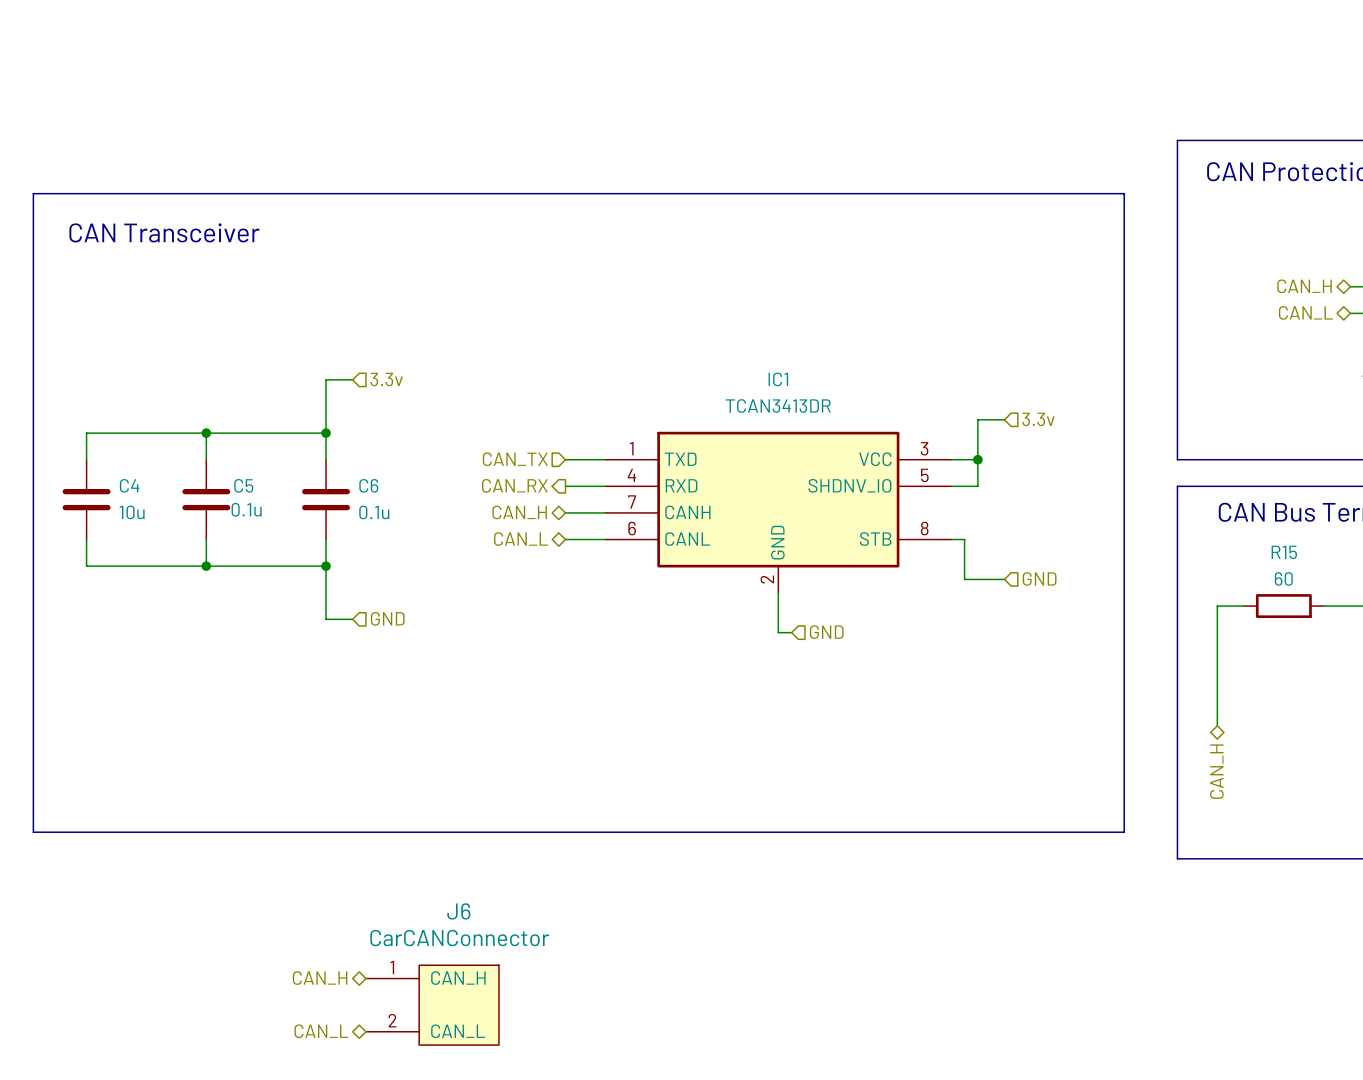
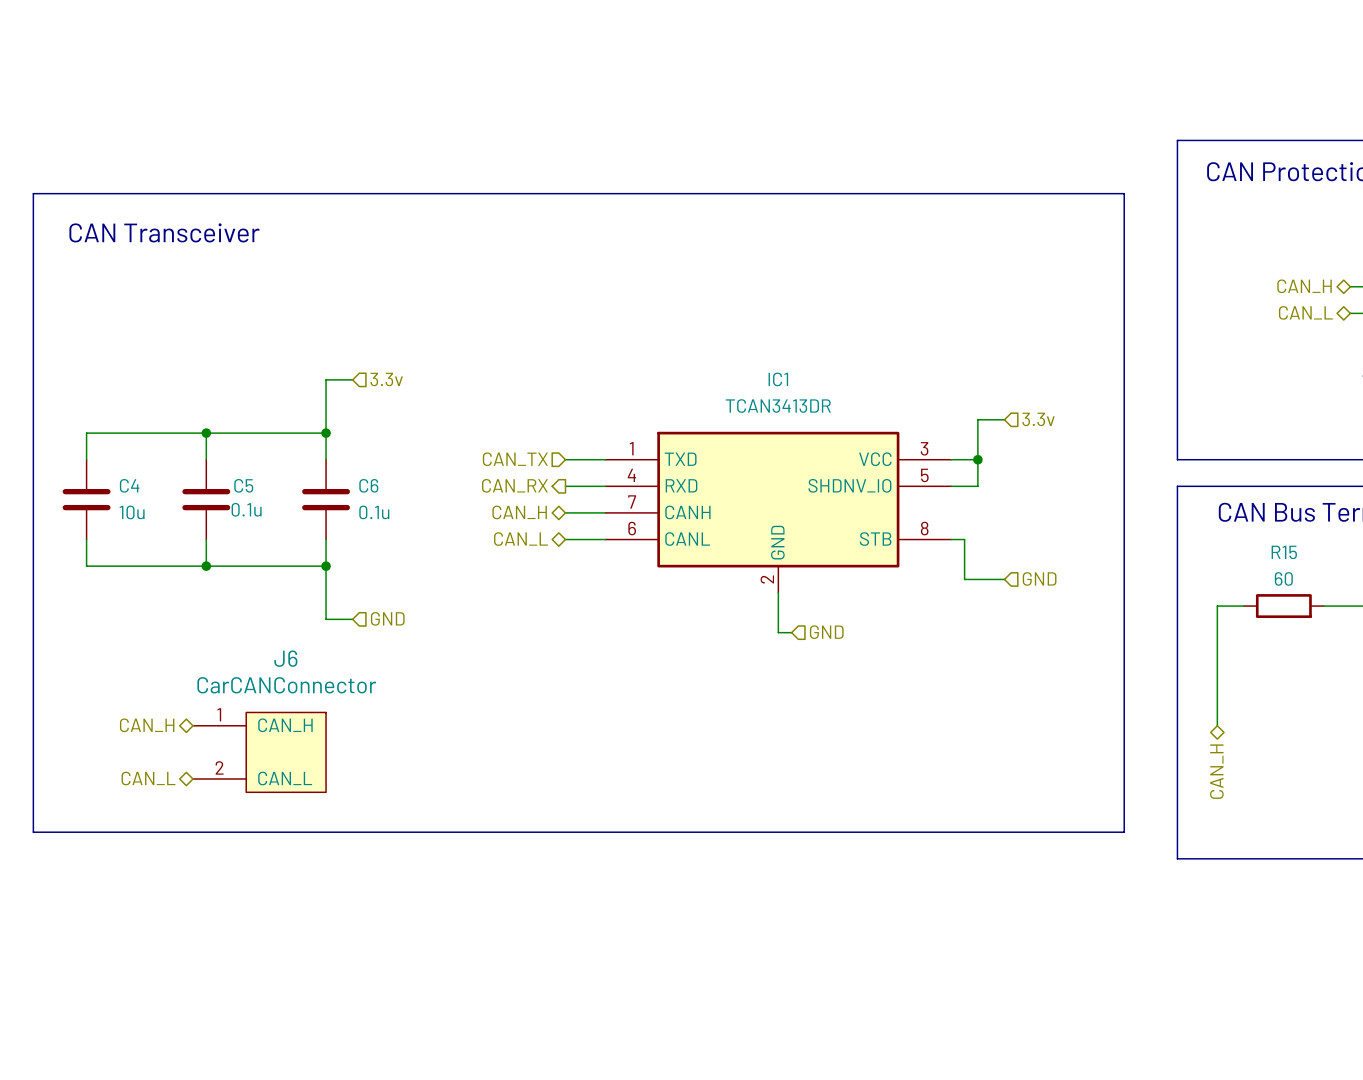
hierarchical label: none -> CAN_H (147, 725)
hierarchical label: none -> CAN_L (148, 778)
hierarchical label: CAN_H (320, 978) -> none
J6 position: (432, 1005) -> (259, 752)
hierarchical label: CAN_L (321, 1031) -> none

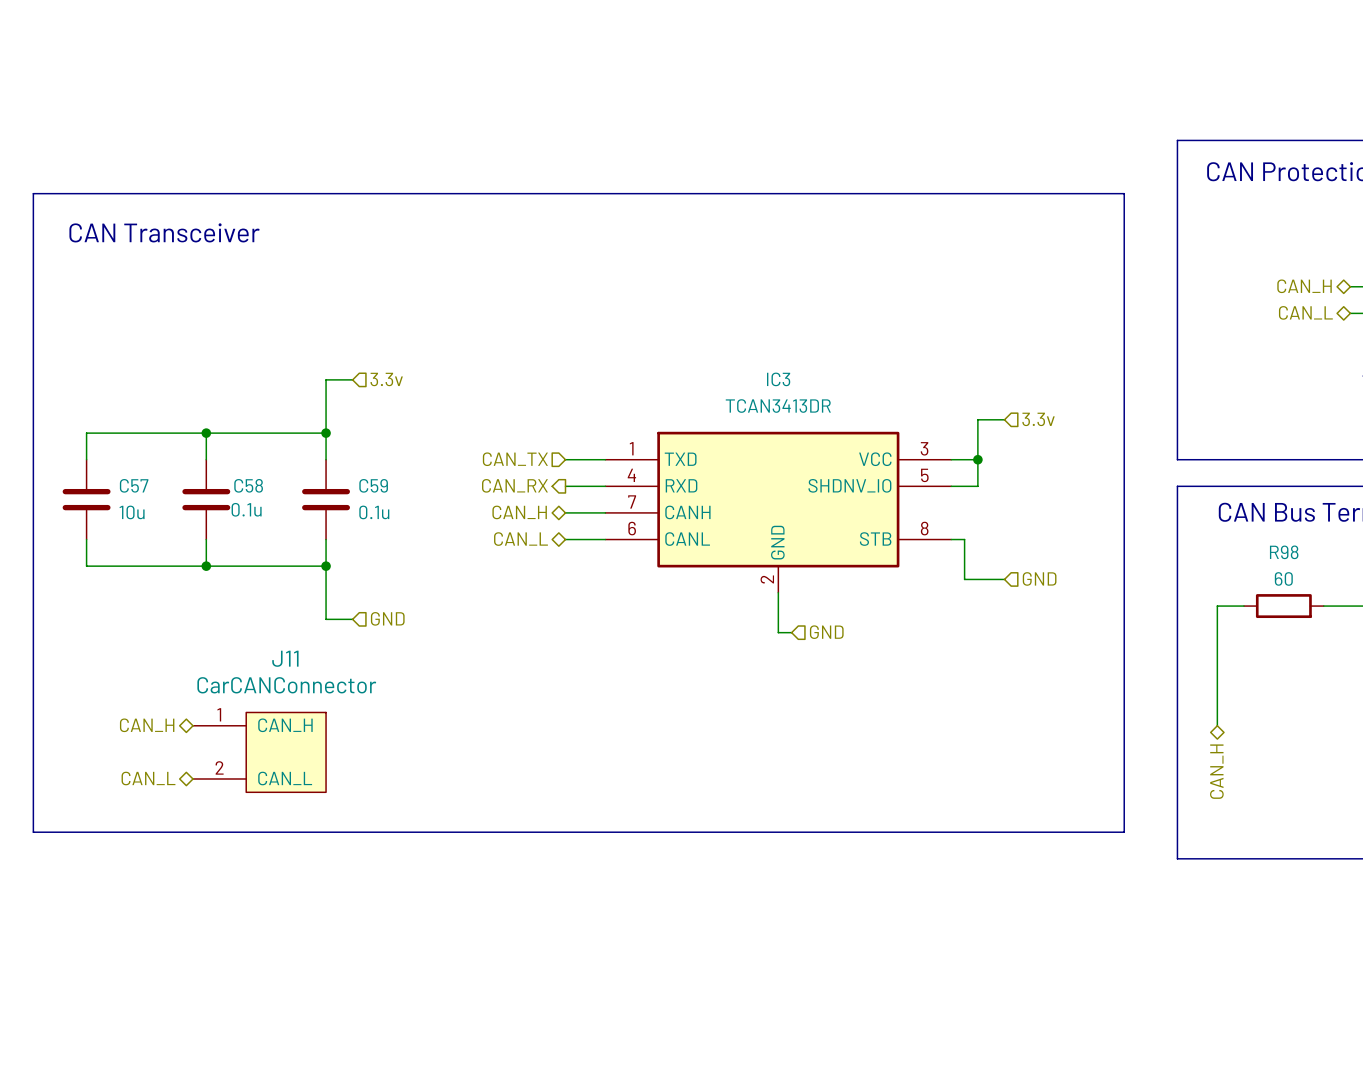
IC1 name: IC1 (778, 379) -> IC3 (778, 379)
C4 name: C4 (129, 485) -> C57 (134, 485)
C5 name: C5 (243, 485) -> C58 (248, 485)
C6 name: C6 (368, 485) -> C59 (373, 485)
R15 name: R15 (1284, 552) -> R98 (1284, 552)
J6 name: J6 (285, 658) -> J11 (285, 658)

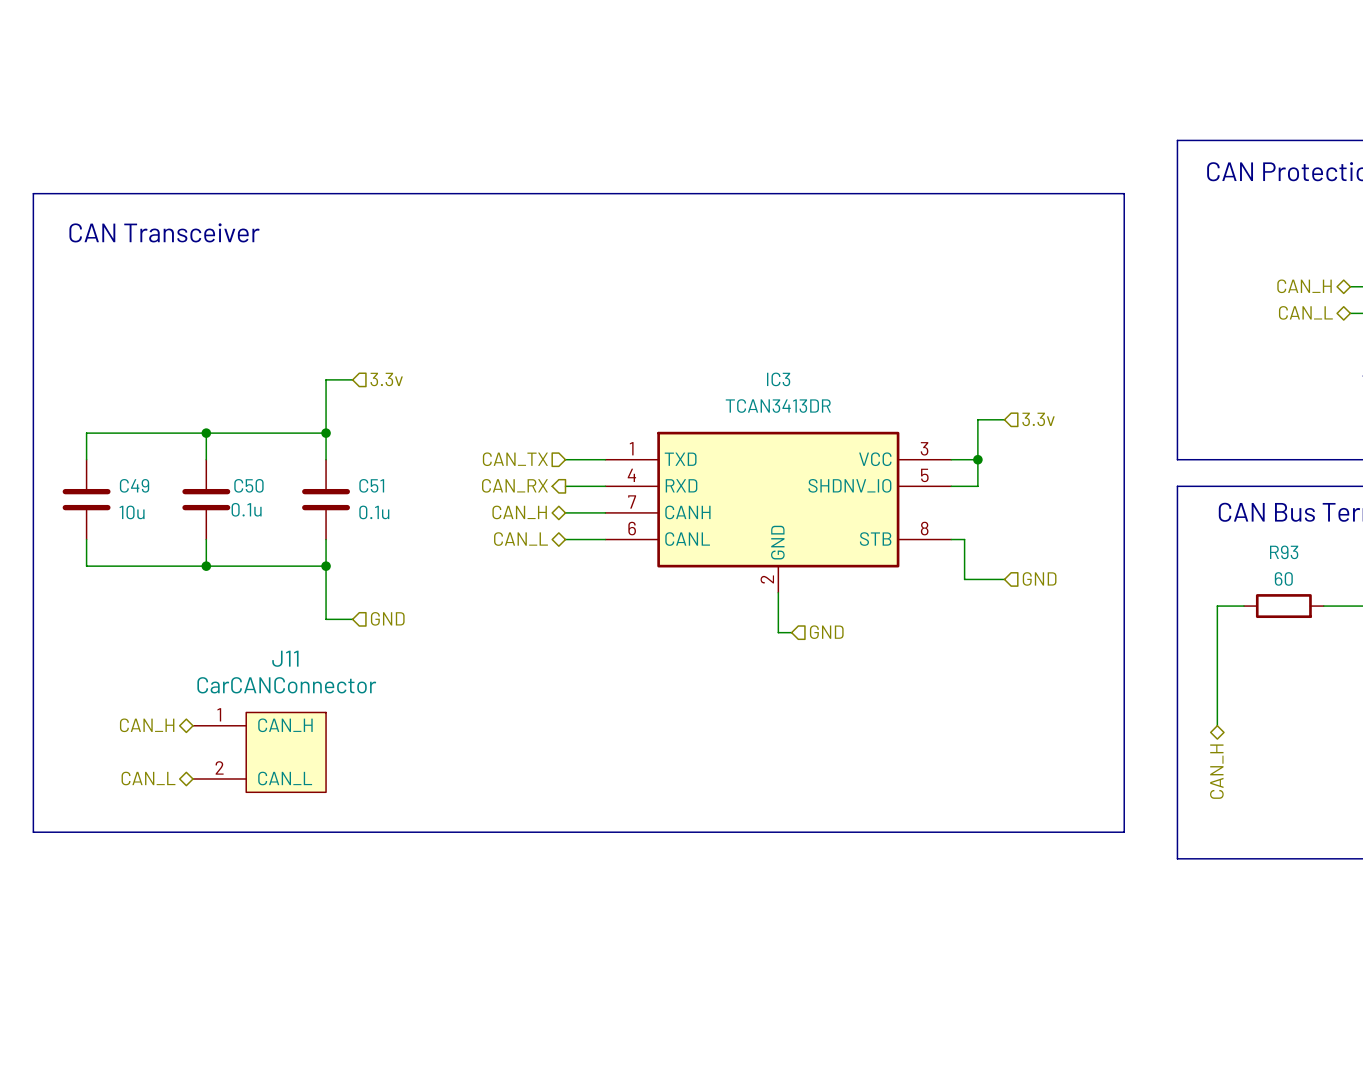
C57 name: C57 (134, 485) -> C49 (134, 485)
C58 name: C58 (248, 485) -> C50 (248, 485)
C59 name: C59 (373, 485) -> C51 (371, 485)
R98 name: R98 (1284, 552) -> R93 (1284, 552)

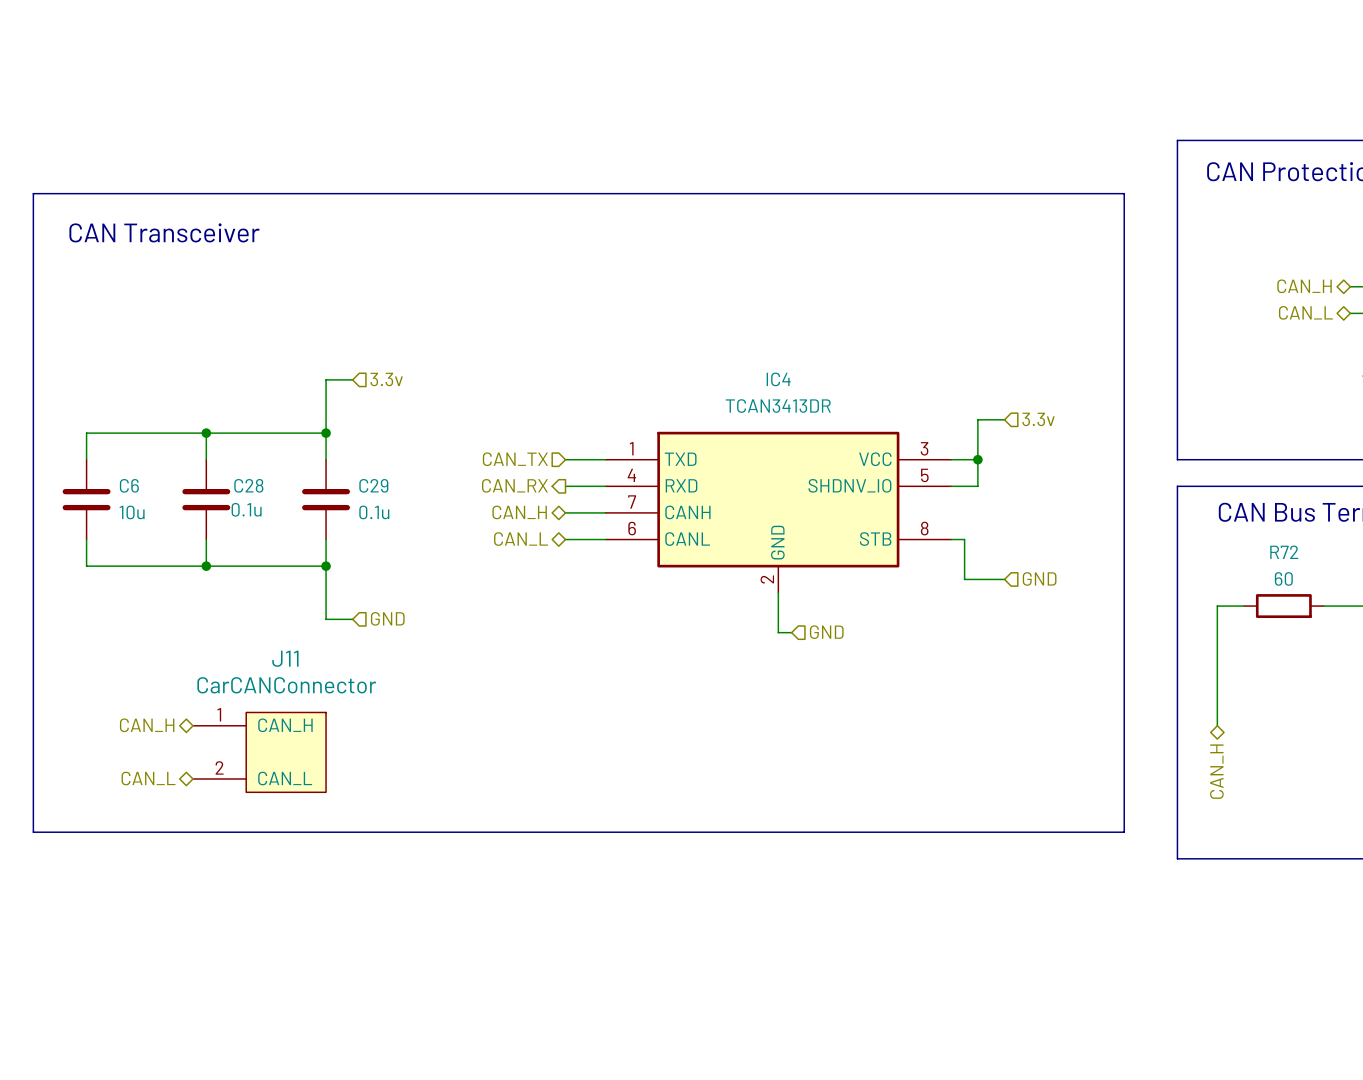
IC3 name: IC3 (778, 379) -> IC4 (778, 379)
C49 name: C49 (134, 485) -> C6 (129, 485)
C50 name: C50 (248, 485) -> C28 (248, 485)
C51 name: C51 (371, 485) -> C29 (373, 485)
R93 name: R93 (1284, 552) -> R72 (1284, 552)

